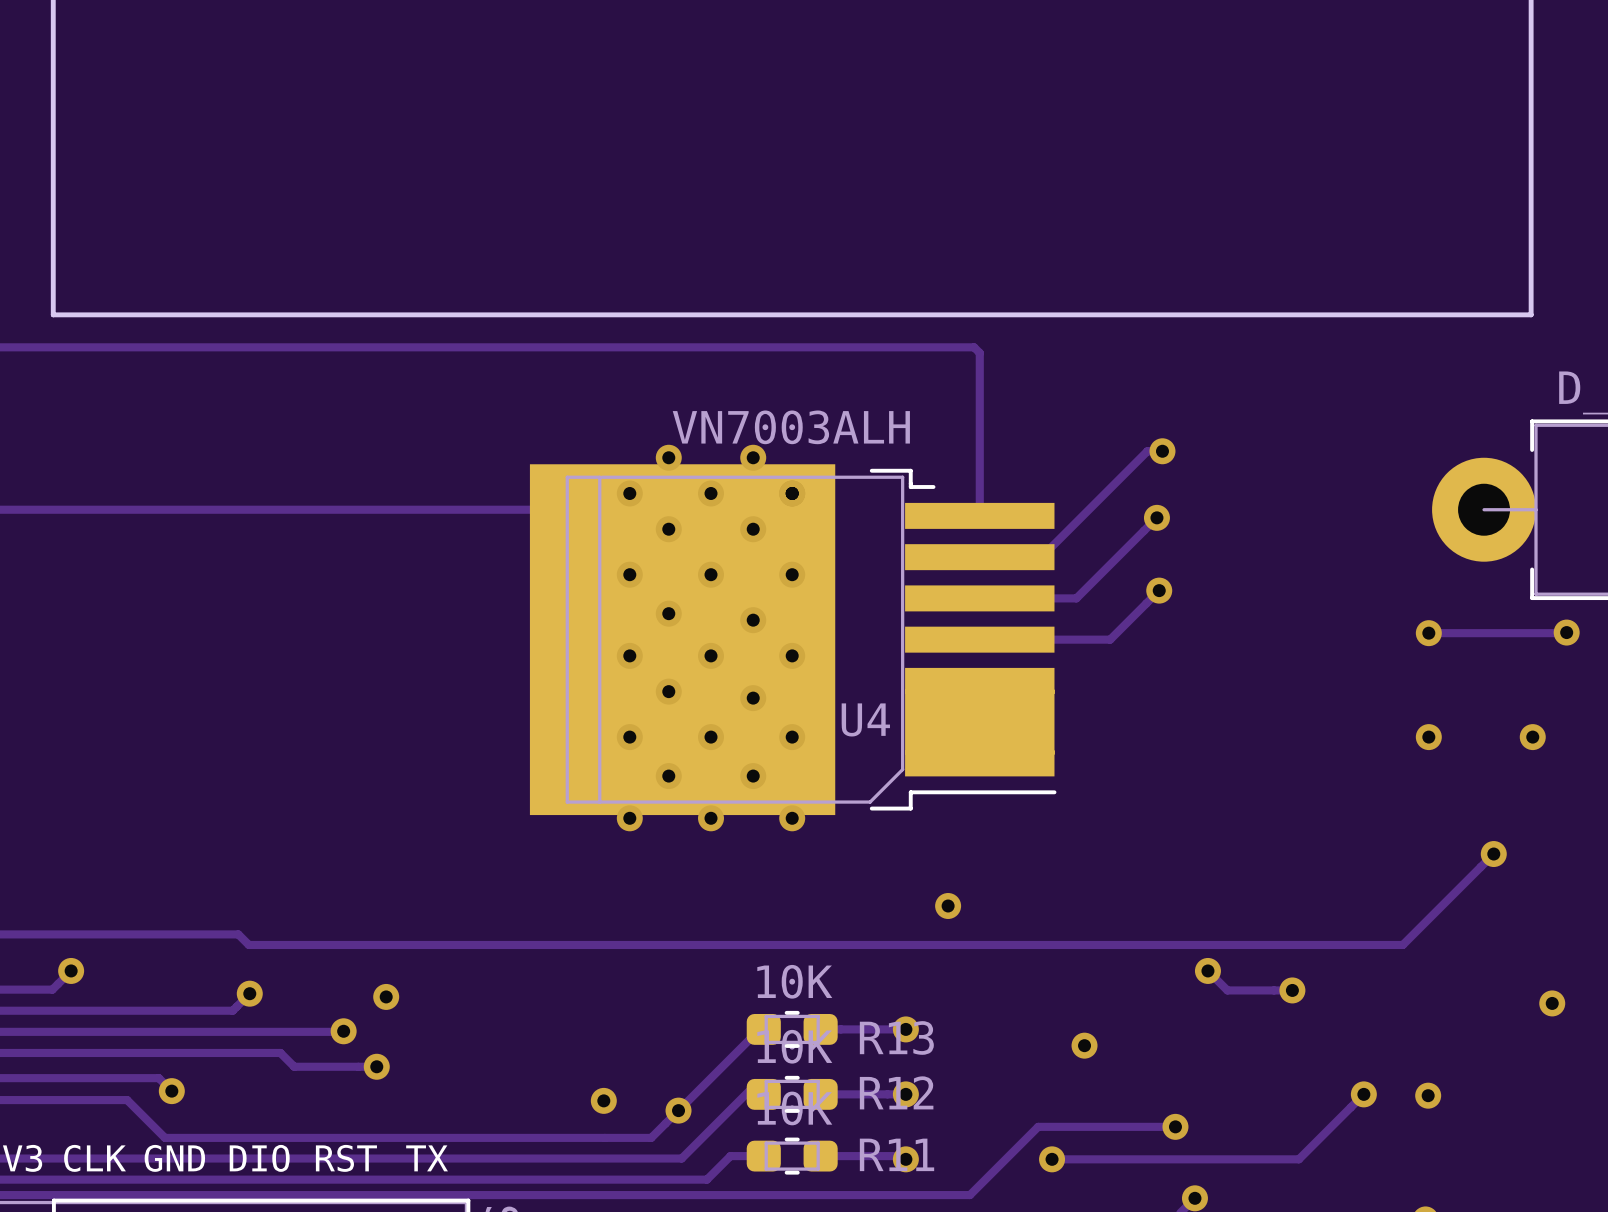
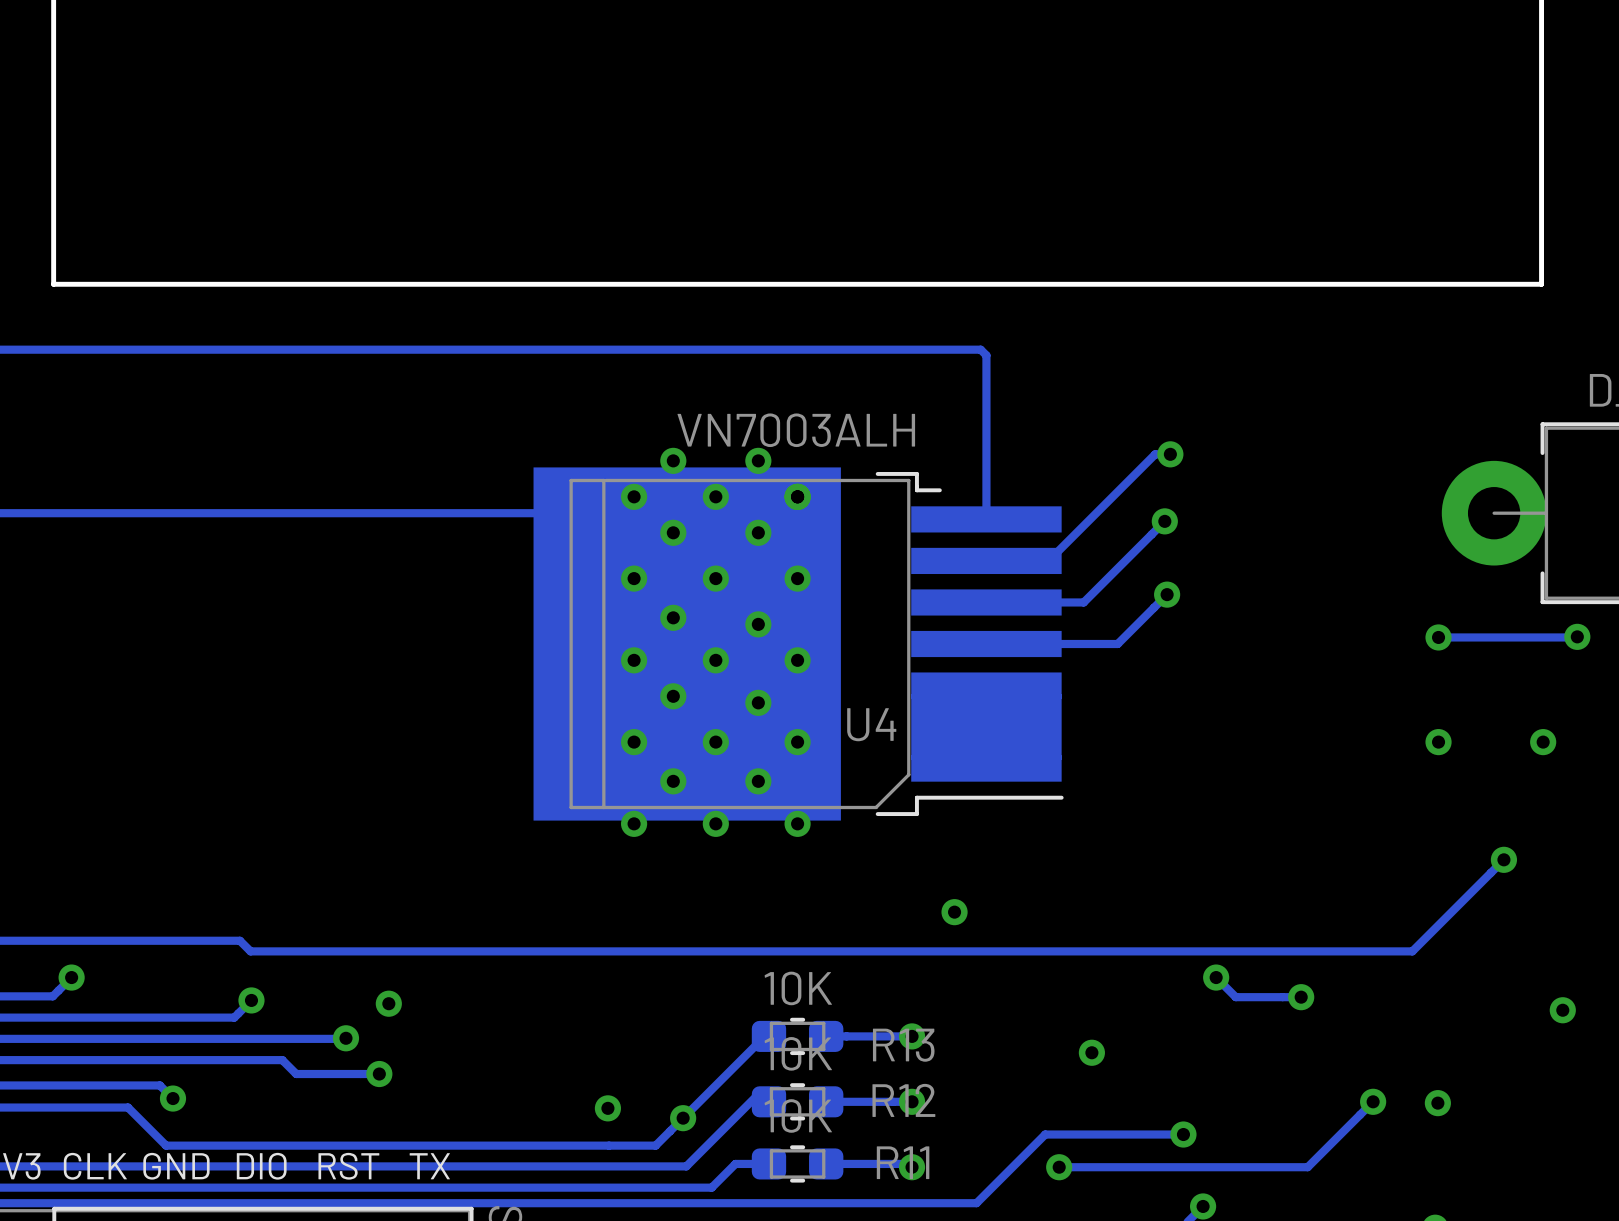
board edge: (1531, 282) (1531, 314) (53, 314) (53, 282) -> (1541, 284) (53, 284)

